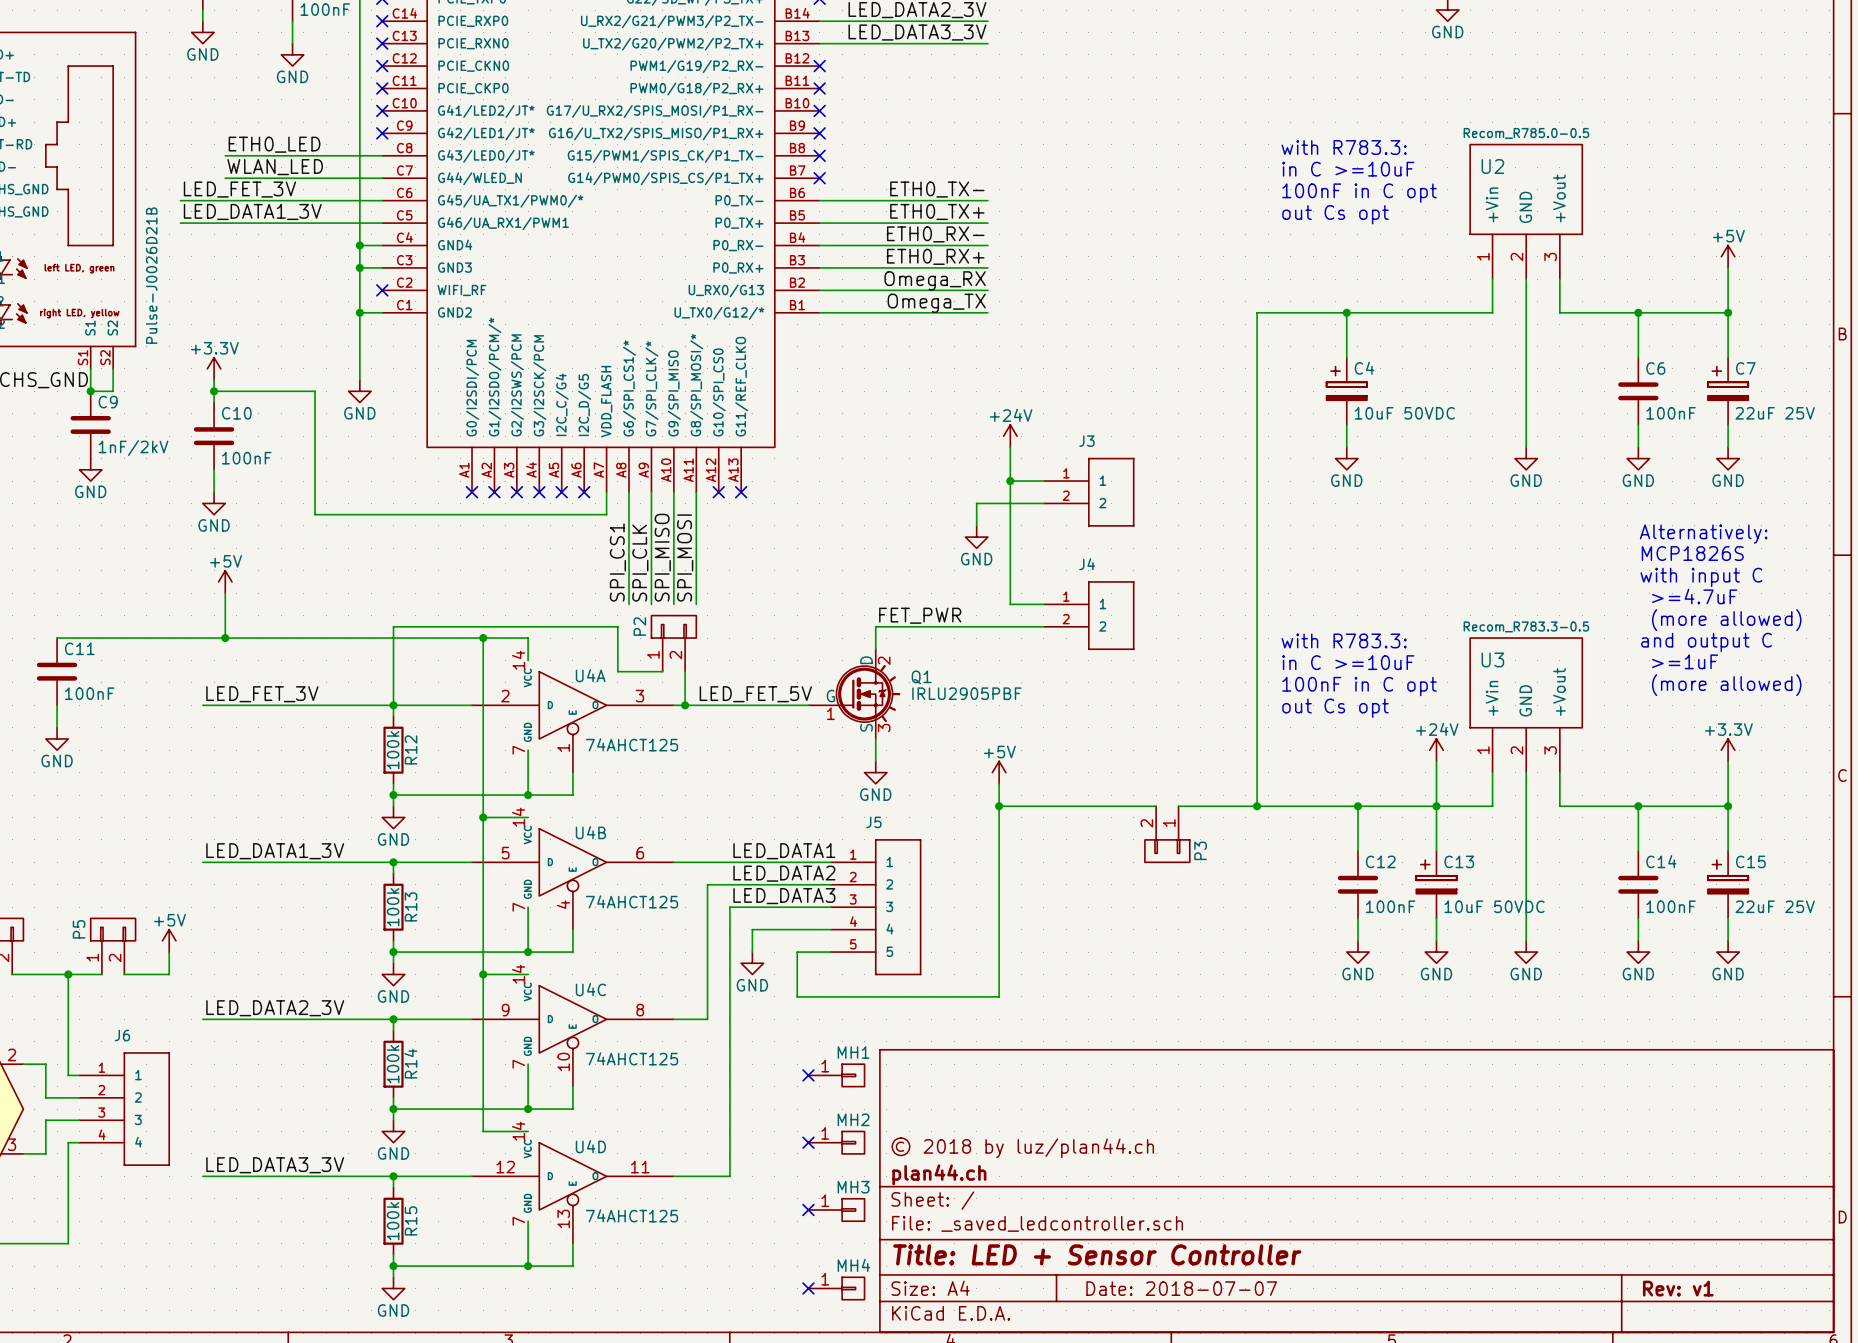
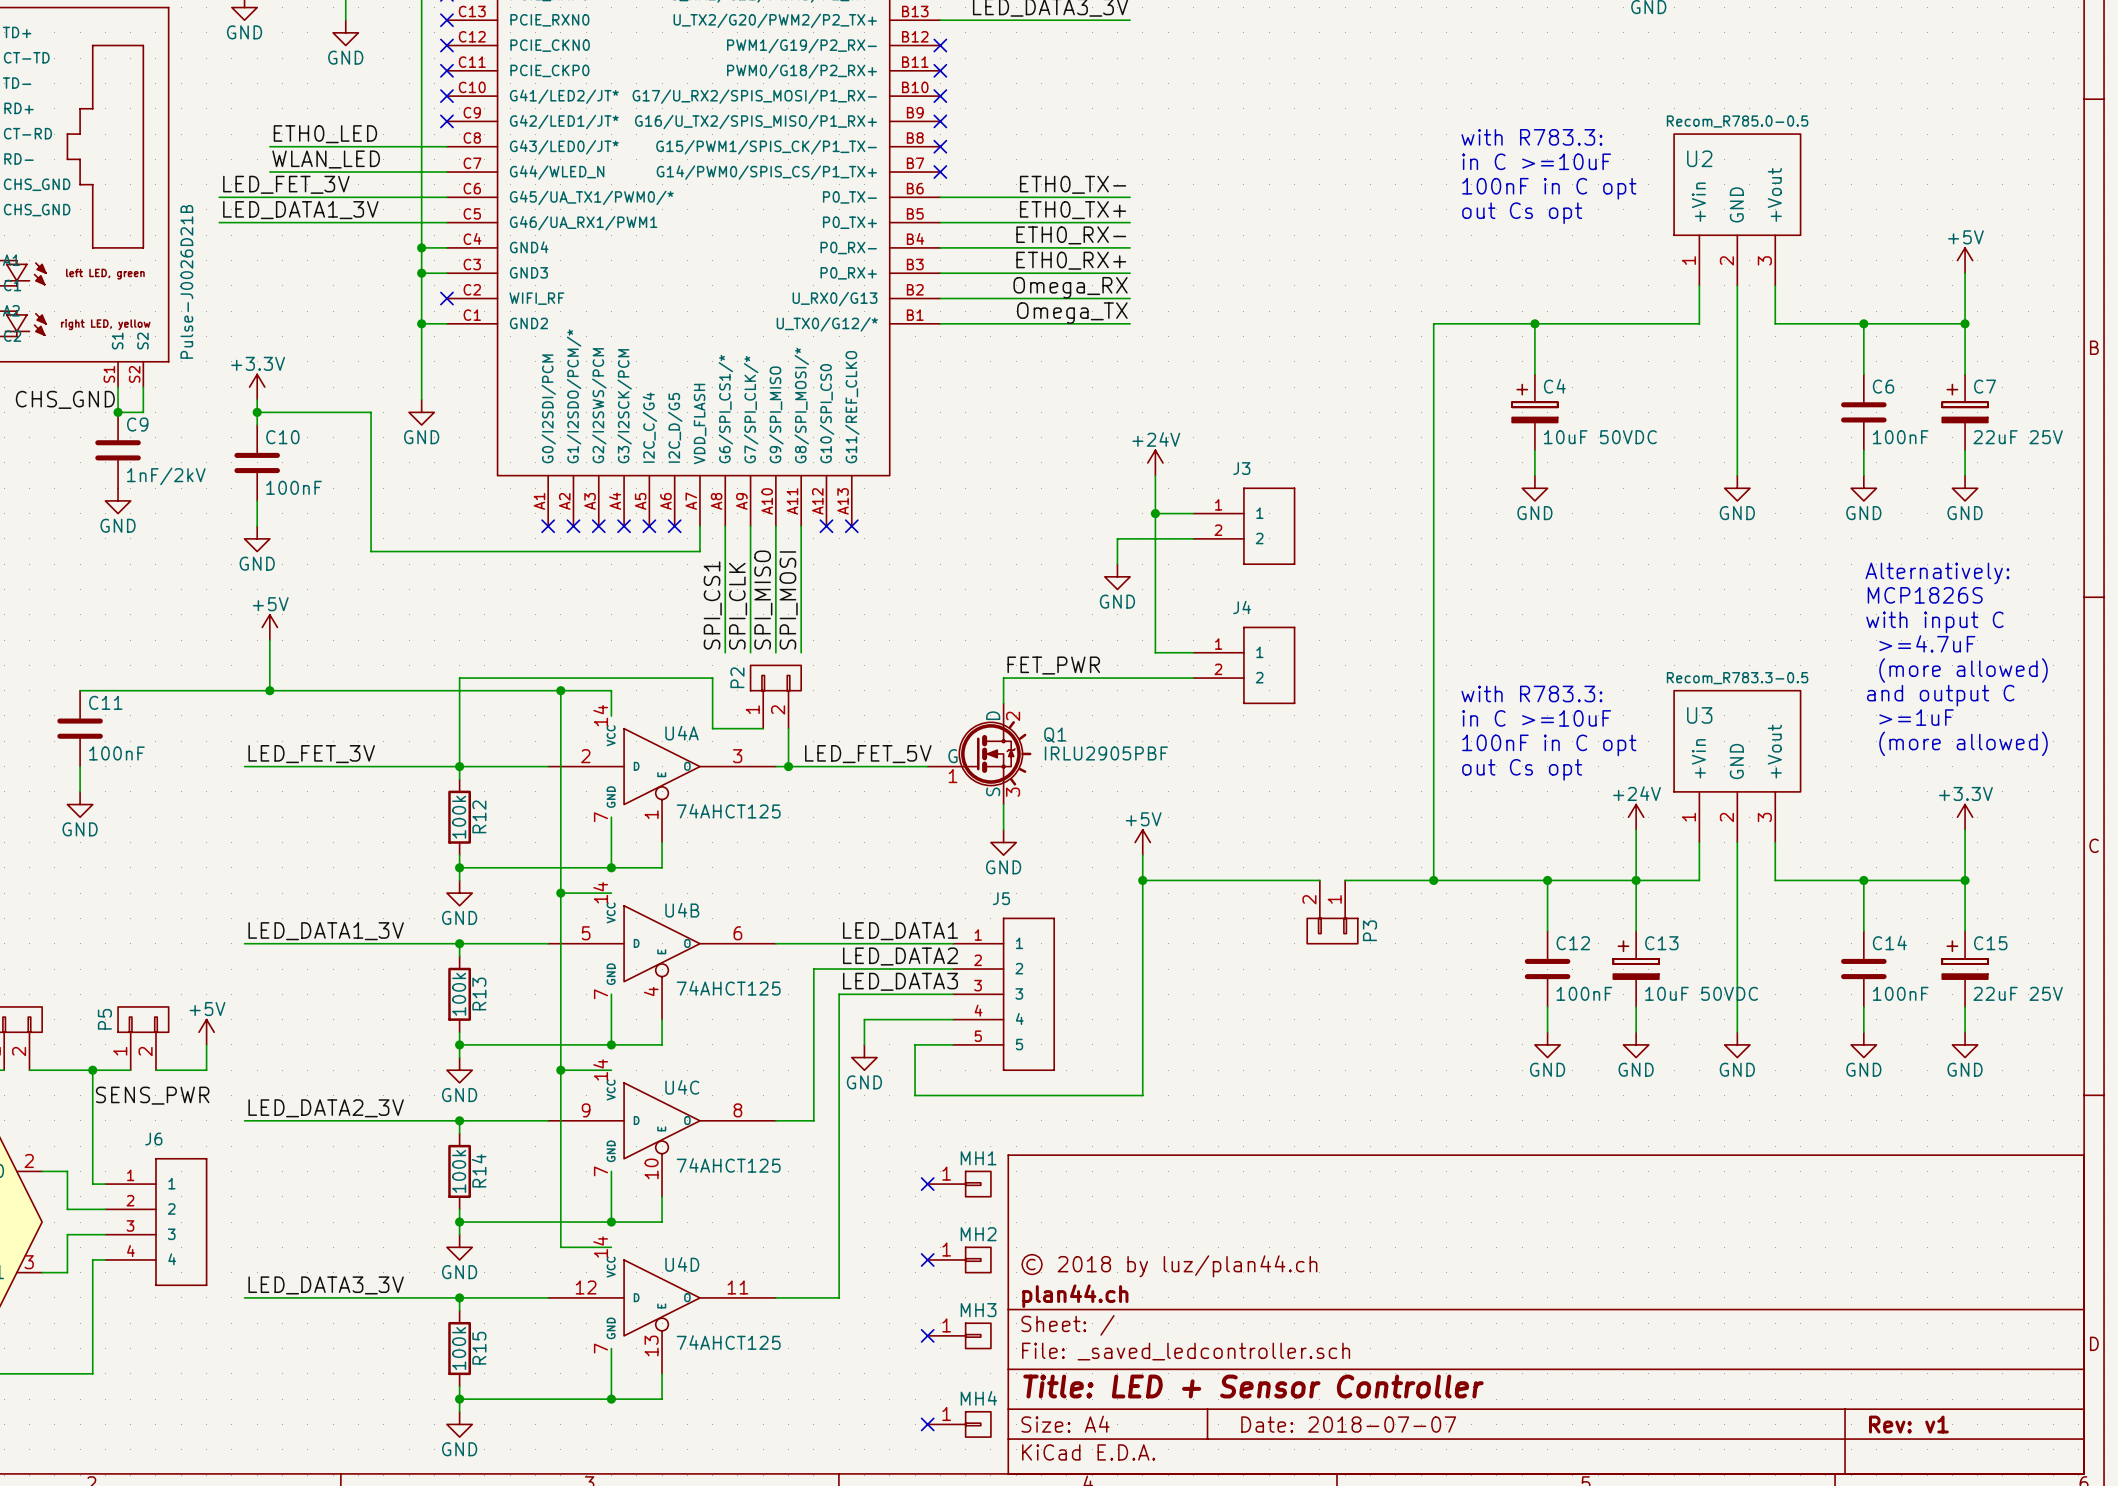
label: none -> SENS_PWR (152, 1095)

